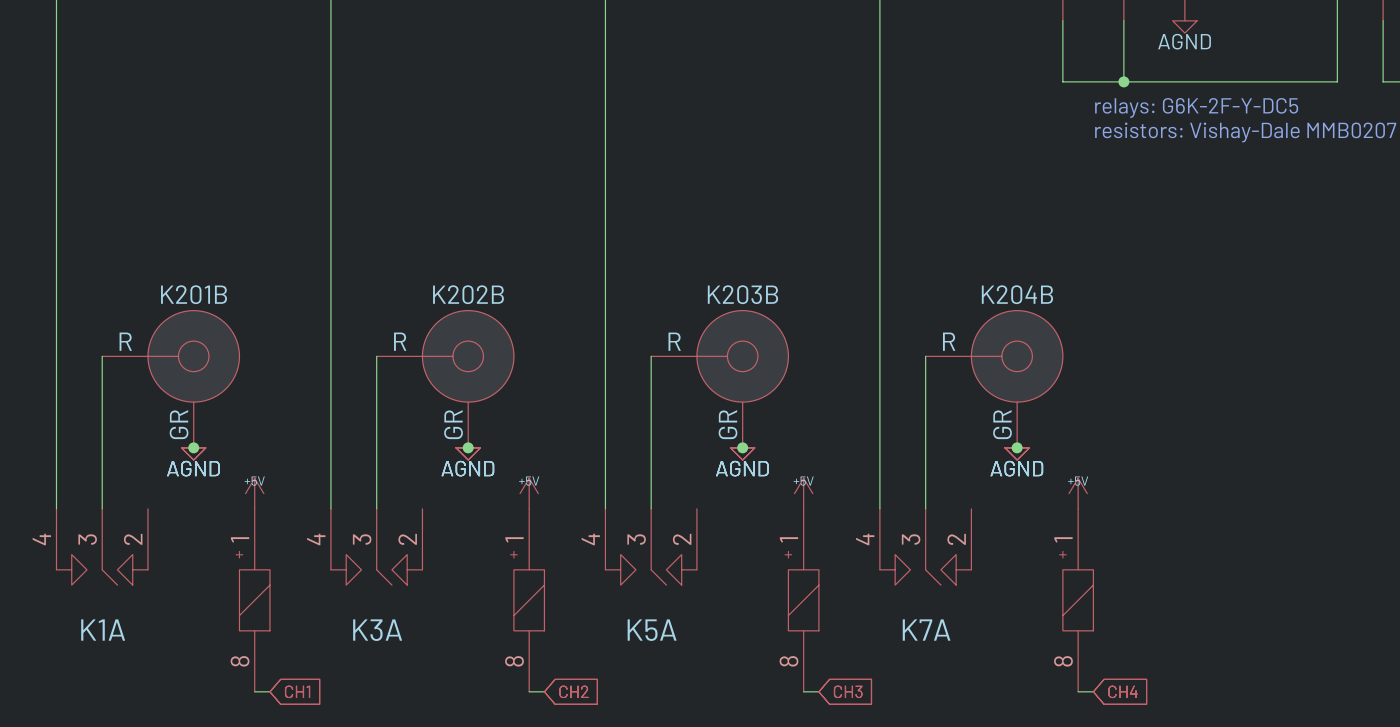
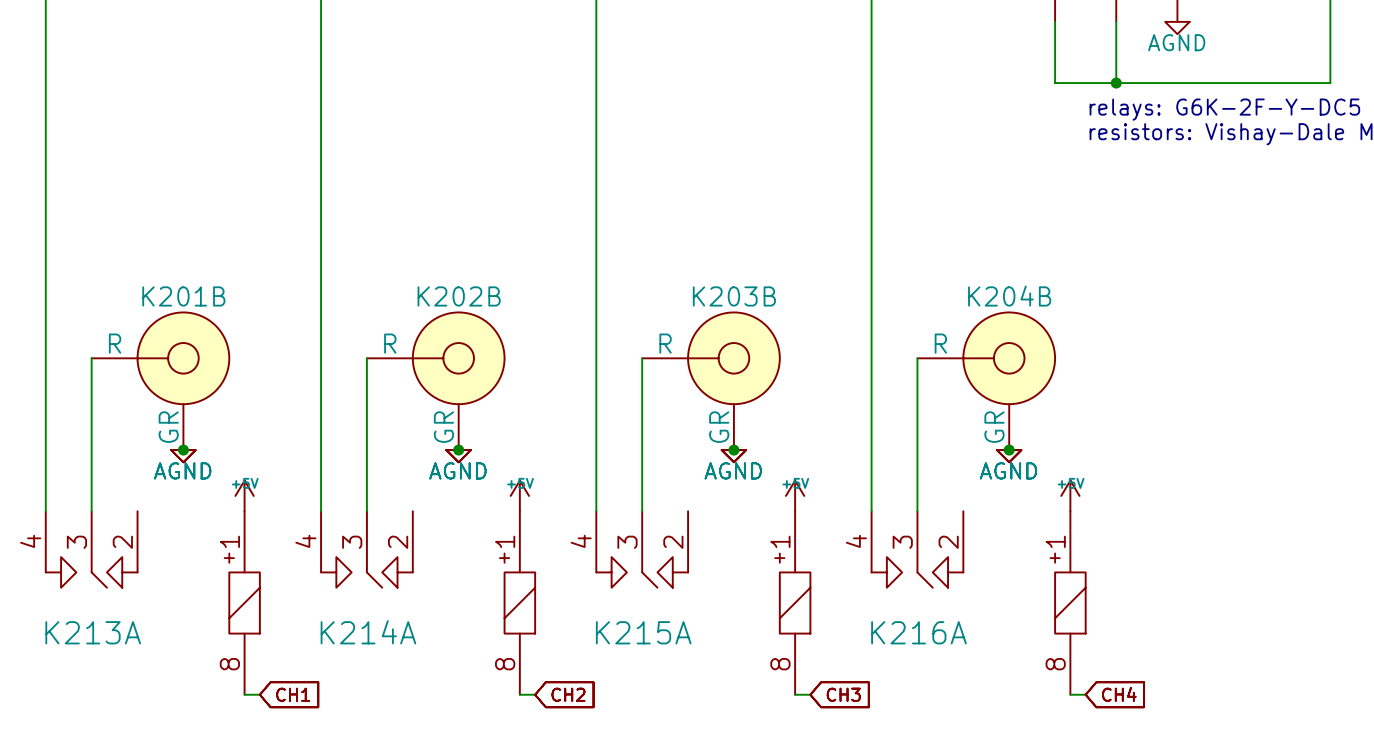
K1A name: K1A (103, 630) -> K213A (93, 632)
K3A name: K3A (377, 630) -> K214A (368, 632)
K5A name: K5A (652, 630) -> K215A (643, 632)
K7A name: K7A (926, 630) -> K216A (918, 632)

